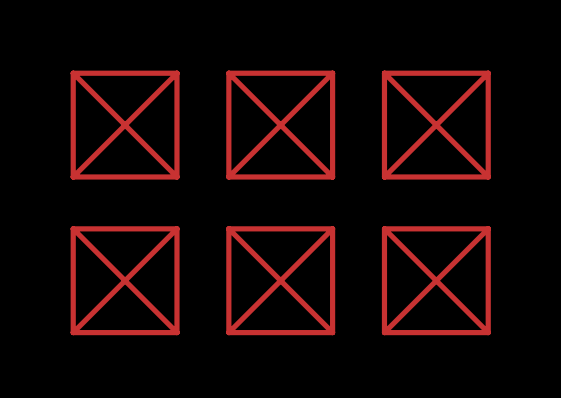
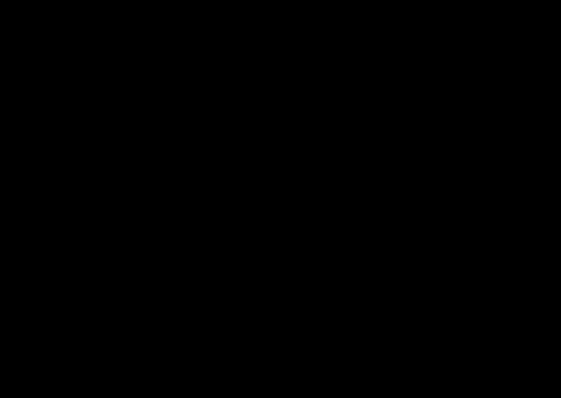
part: (125, 125) -> none
part: (280, 125) -> none
part: (436, 125) -> none
part: (125, 280) -> none
part: (280, 280) -> none
part: (436, 280) -> none

